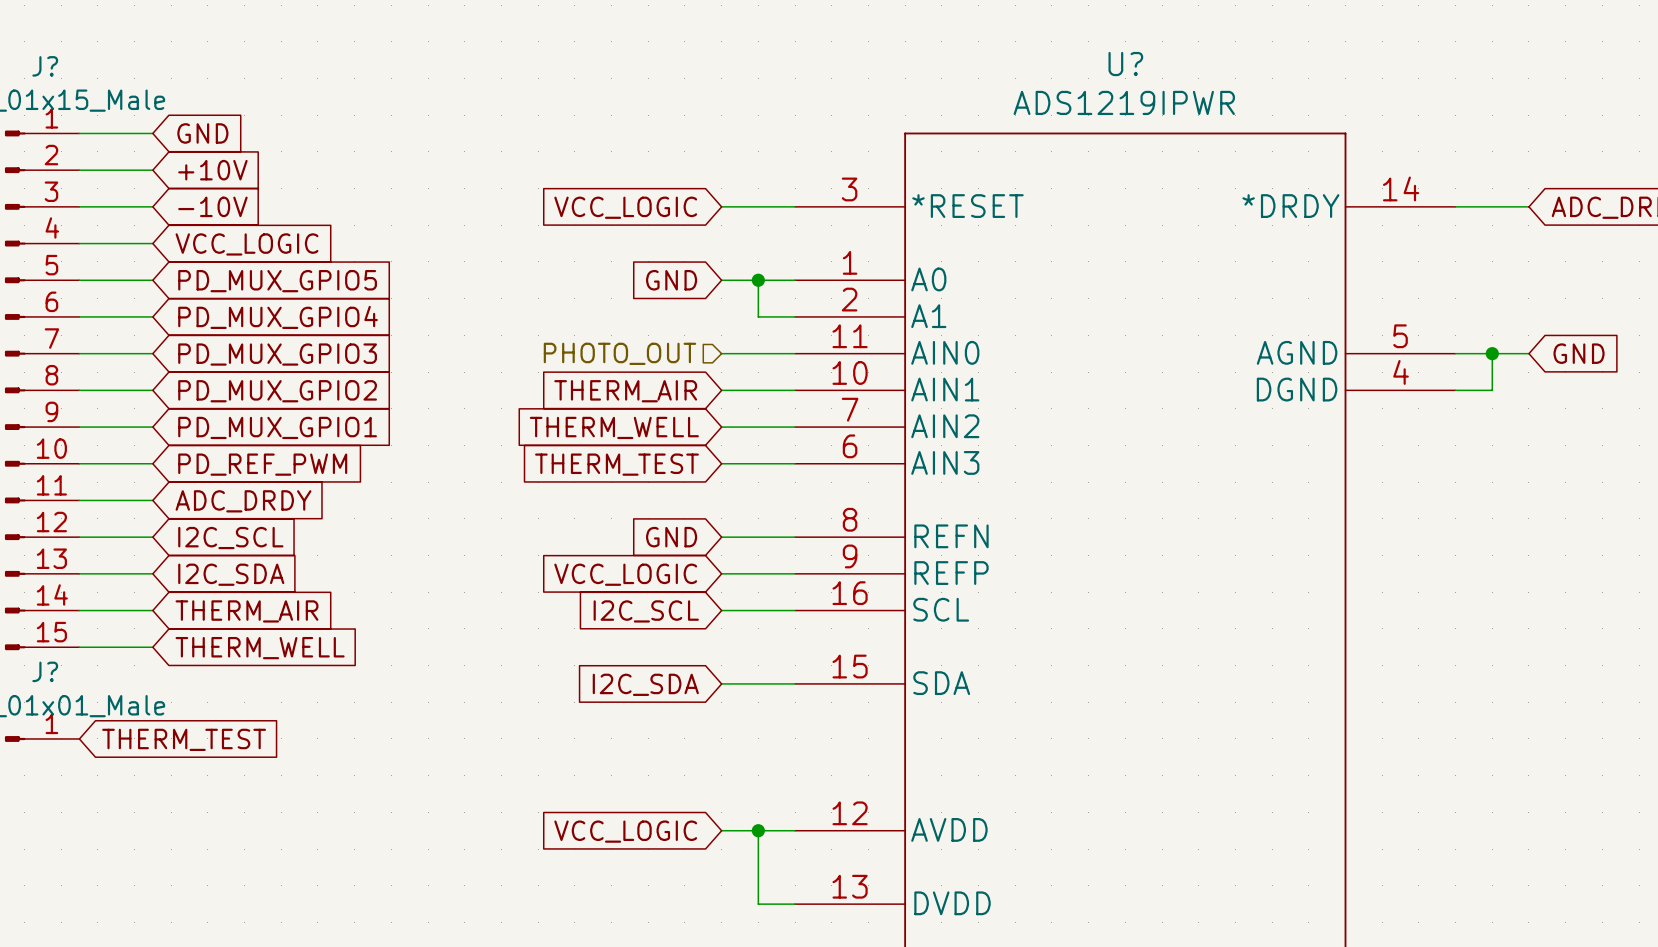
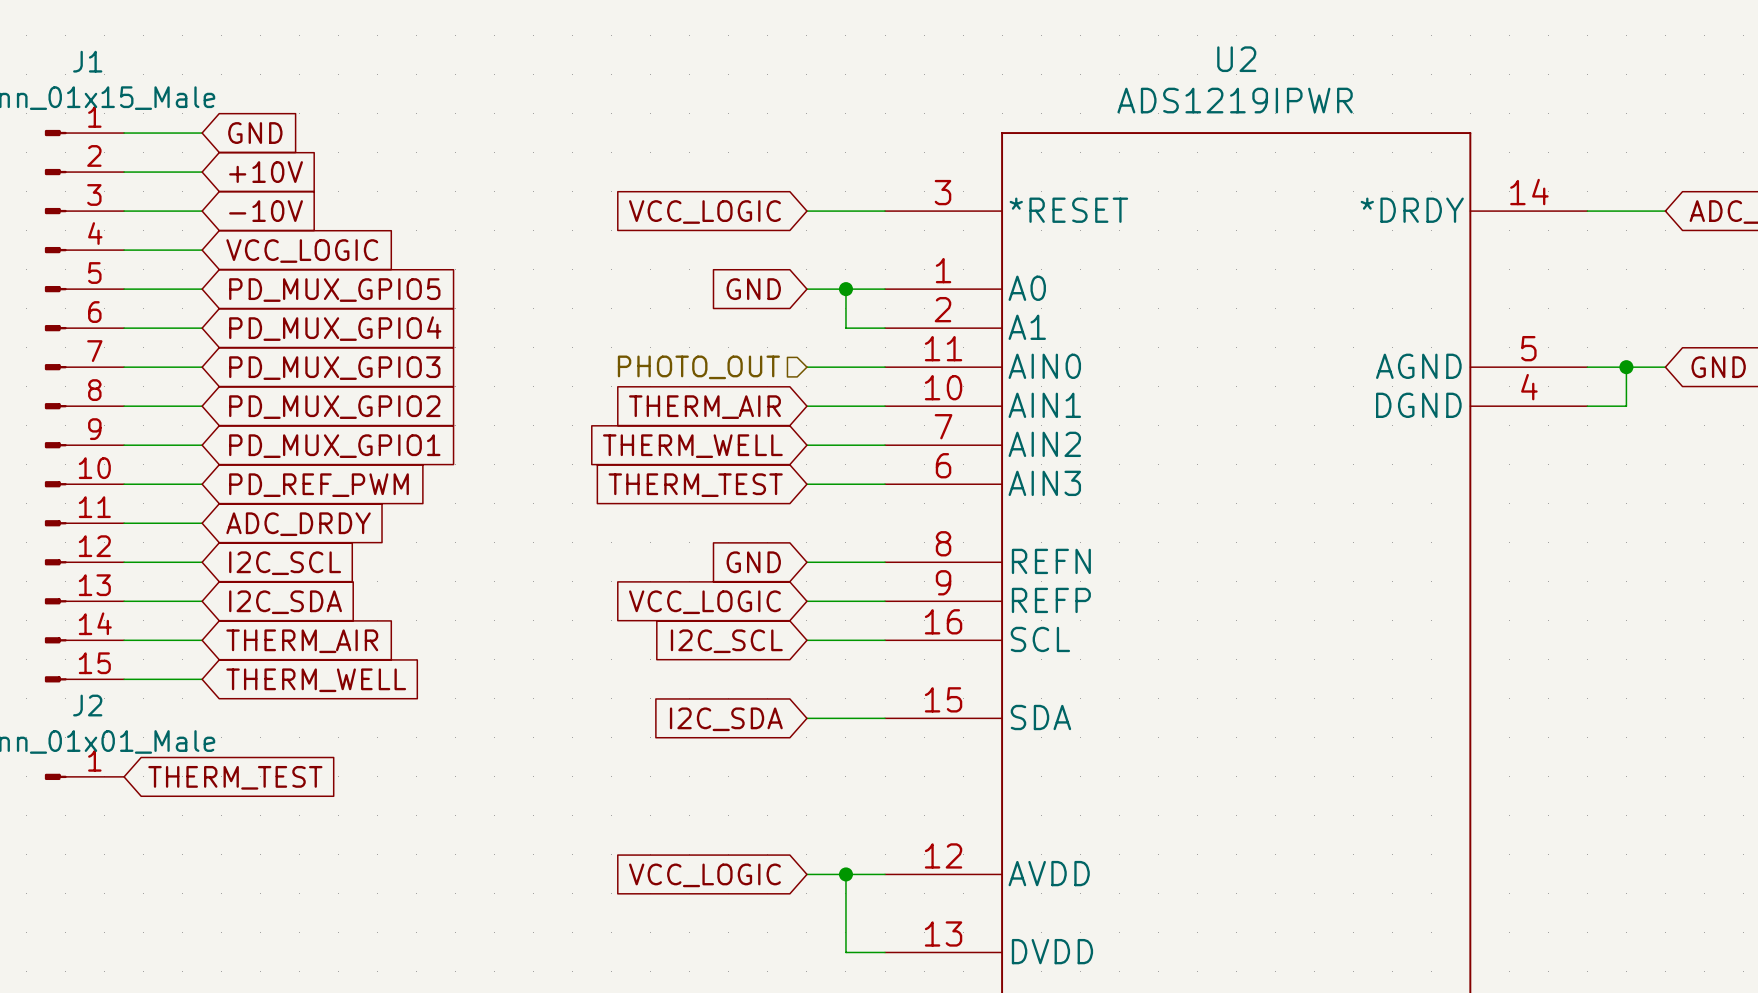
U? name: U? (1125, 64) -> U2 (1236, 59)
J? name: J? (45, 66) -> J1 (87, 61)
J? name: J? (45, 671) -> J2 (87, 705)

